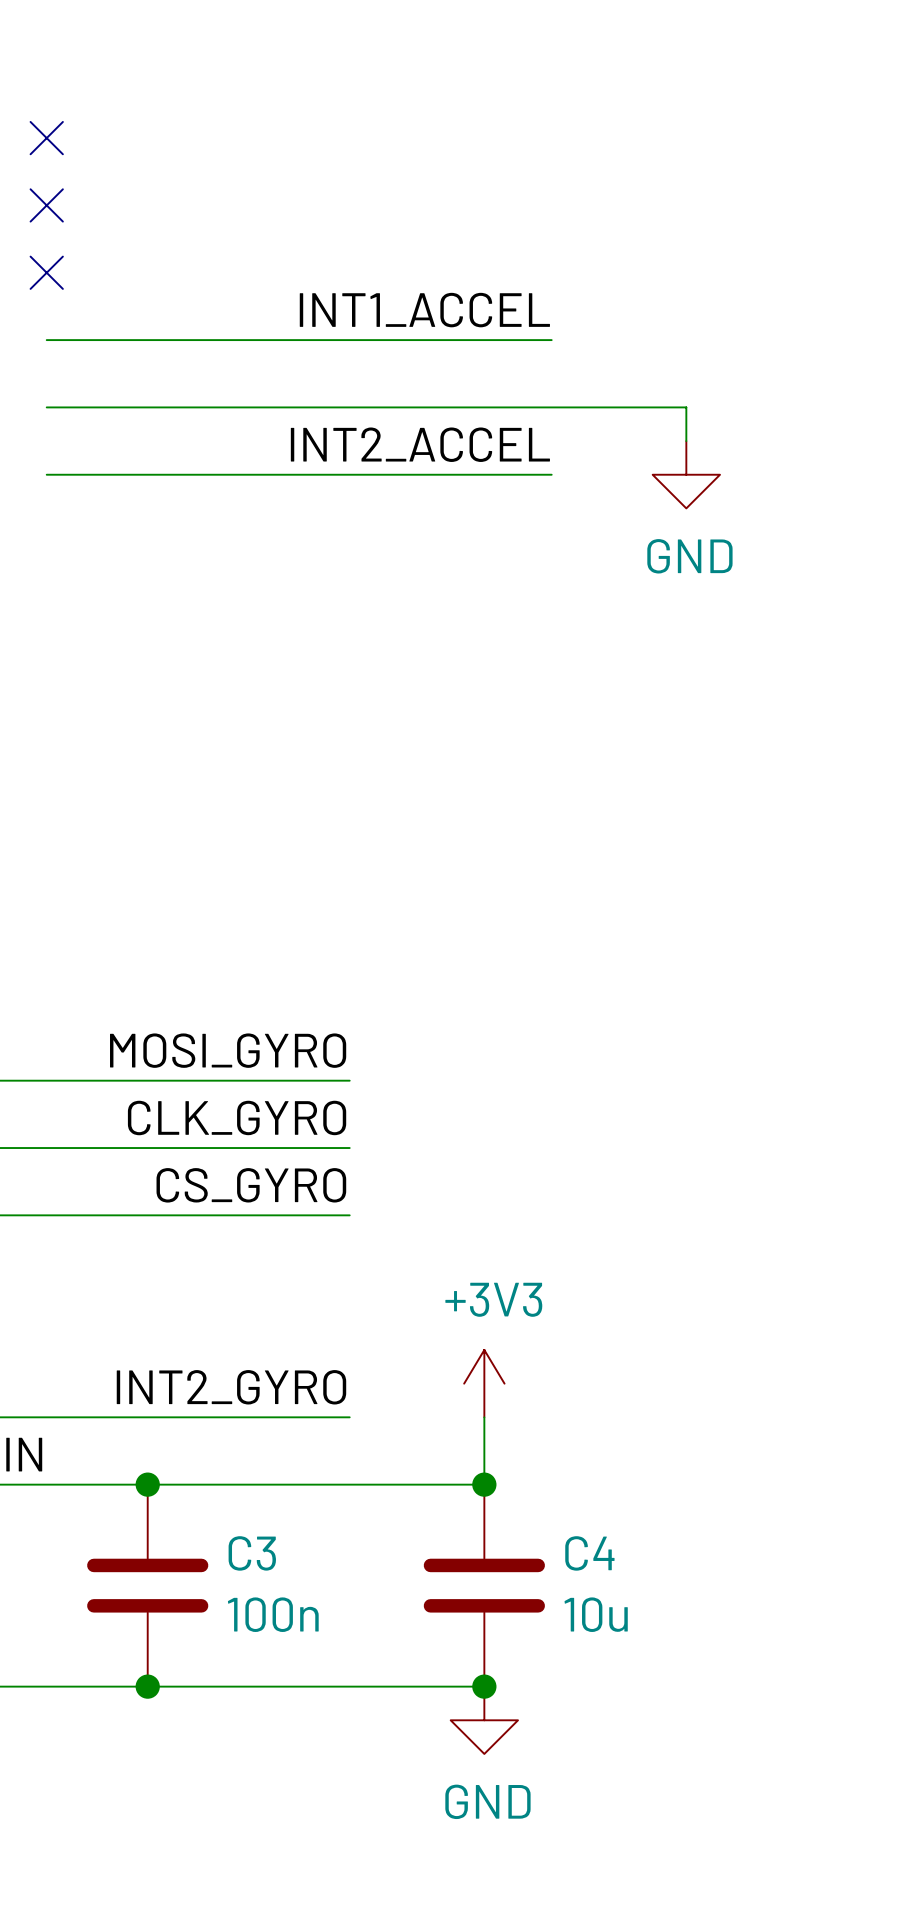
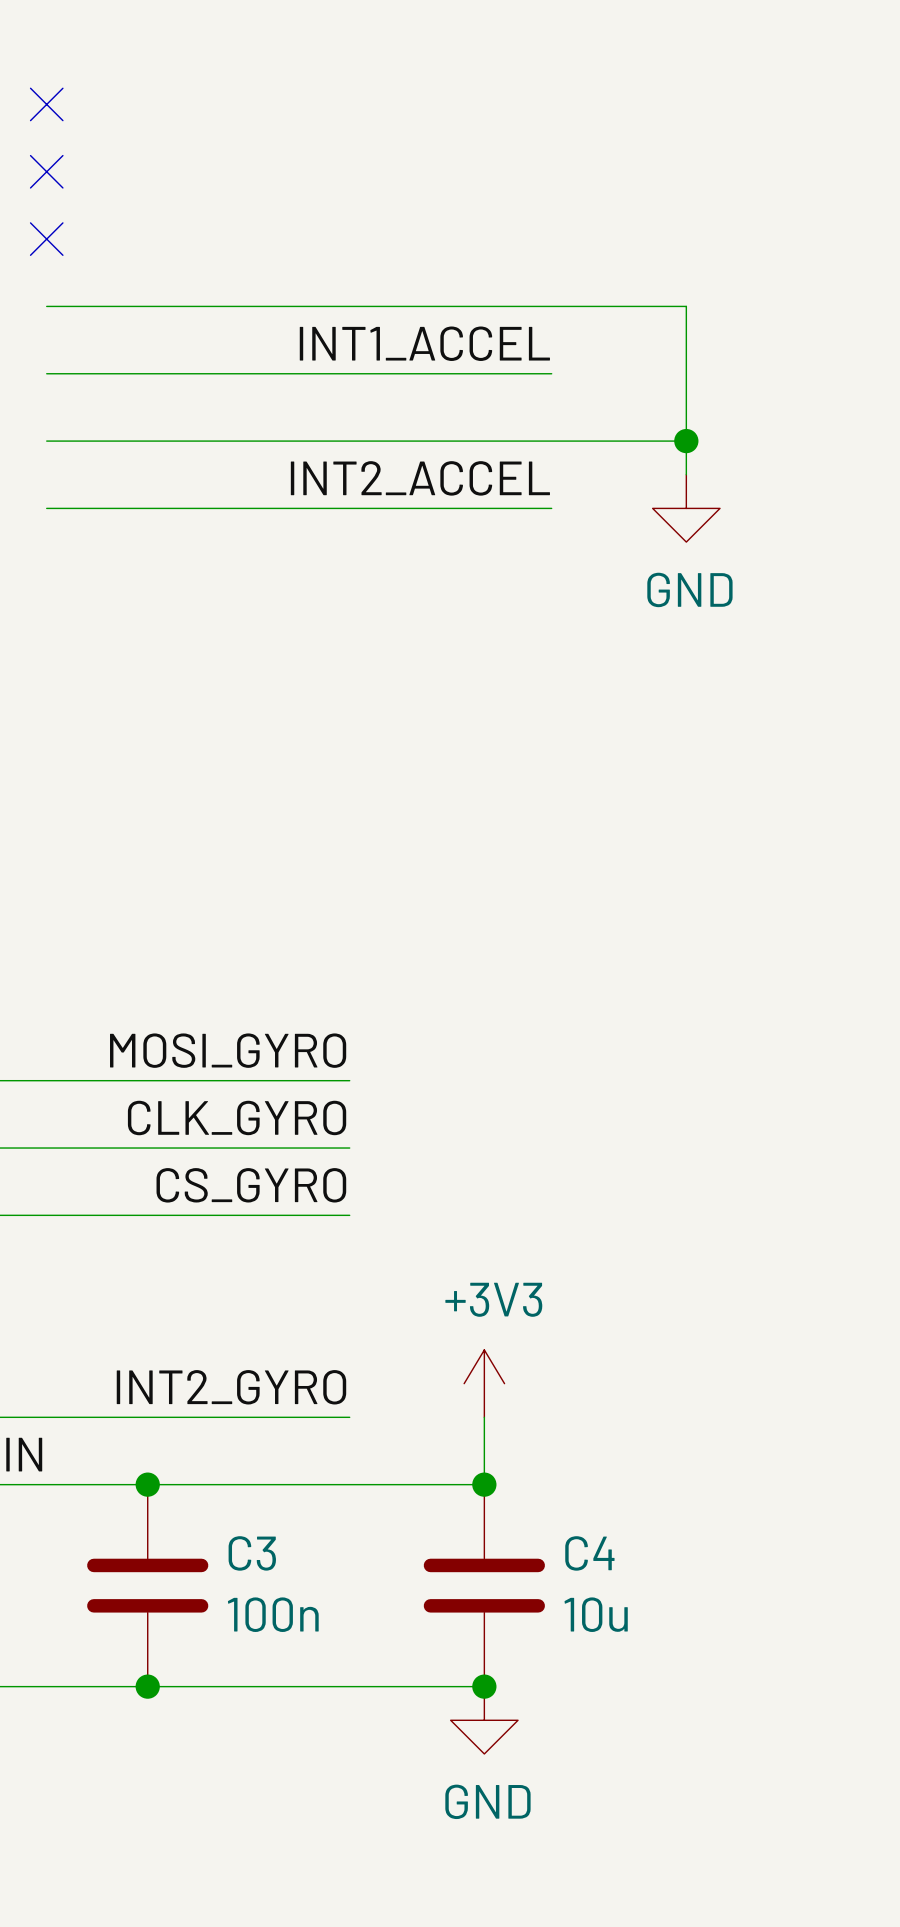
no-connect mark: none -> (46, 104)
no-connect mark: (46, 138) -> none
no-connect mark: none -> (46, 171)
no-connect mark: (46, 205) -> none
no-connect mark: none -> (46, 239)
no-connect mark: (46, 272) -> none
label position: INT1_ACCEL (424, 310) -> INT1_ACCEL (424, 343)
wire: (46, 340) (551, 340) -> (46, 373) (551, 373)
wire: (46, 407) (686, 407) -> (46, 306) (686, 306) (686, 407)
wire: none -> (46, 441) (686, 441) (686, 474)
junction: none -> (686, 441)
label position: INT2_ACCEL (420, 444) -> INT2_ACCEL (420, 478)
wire: (46, 474) (551, 474) -> (46, 508) (551, 508)
power symbol position: GND (686, 474) -> GND (686, 508)

